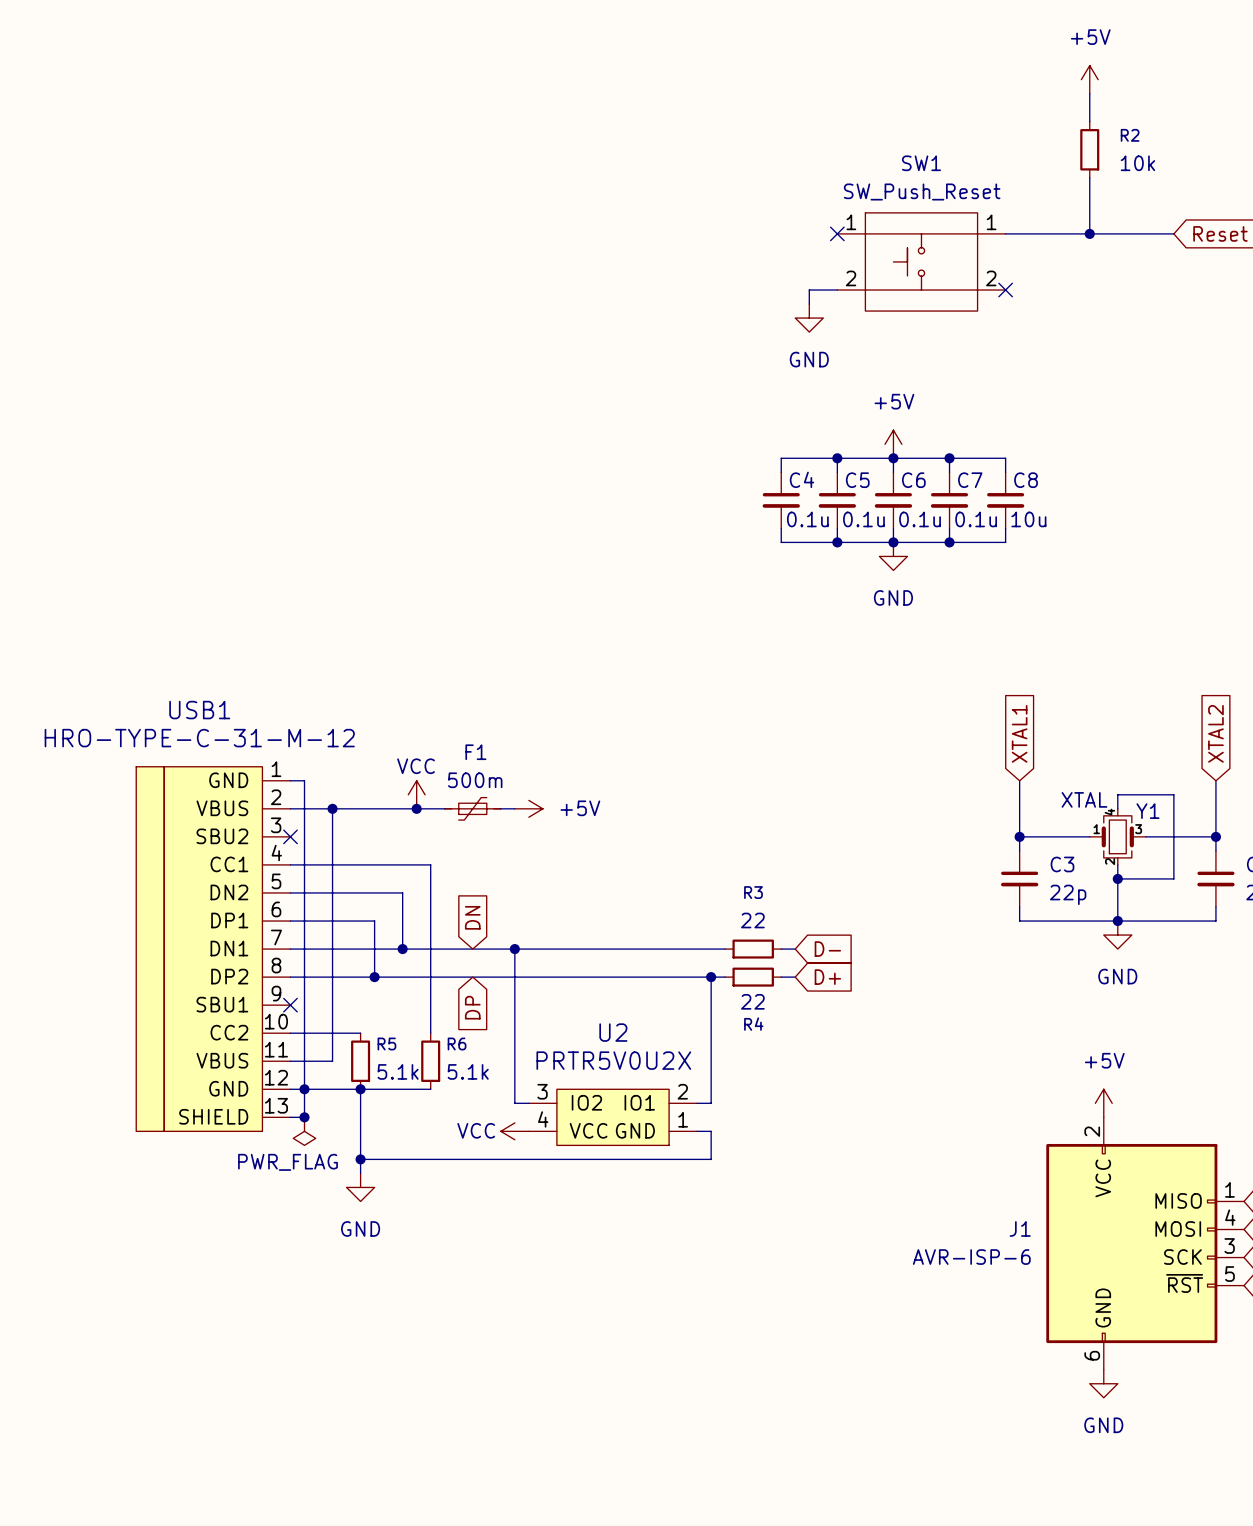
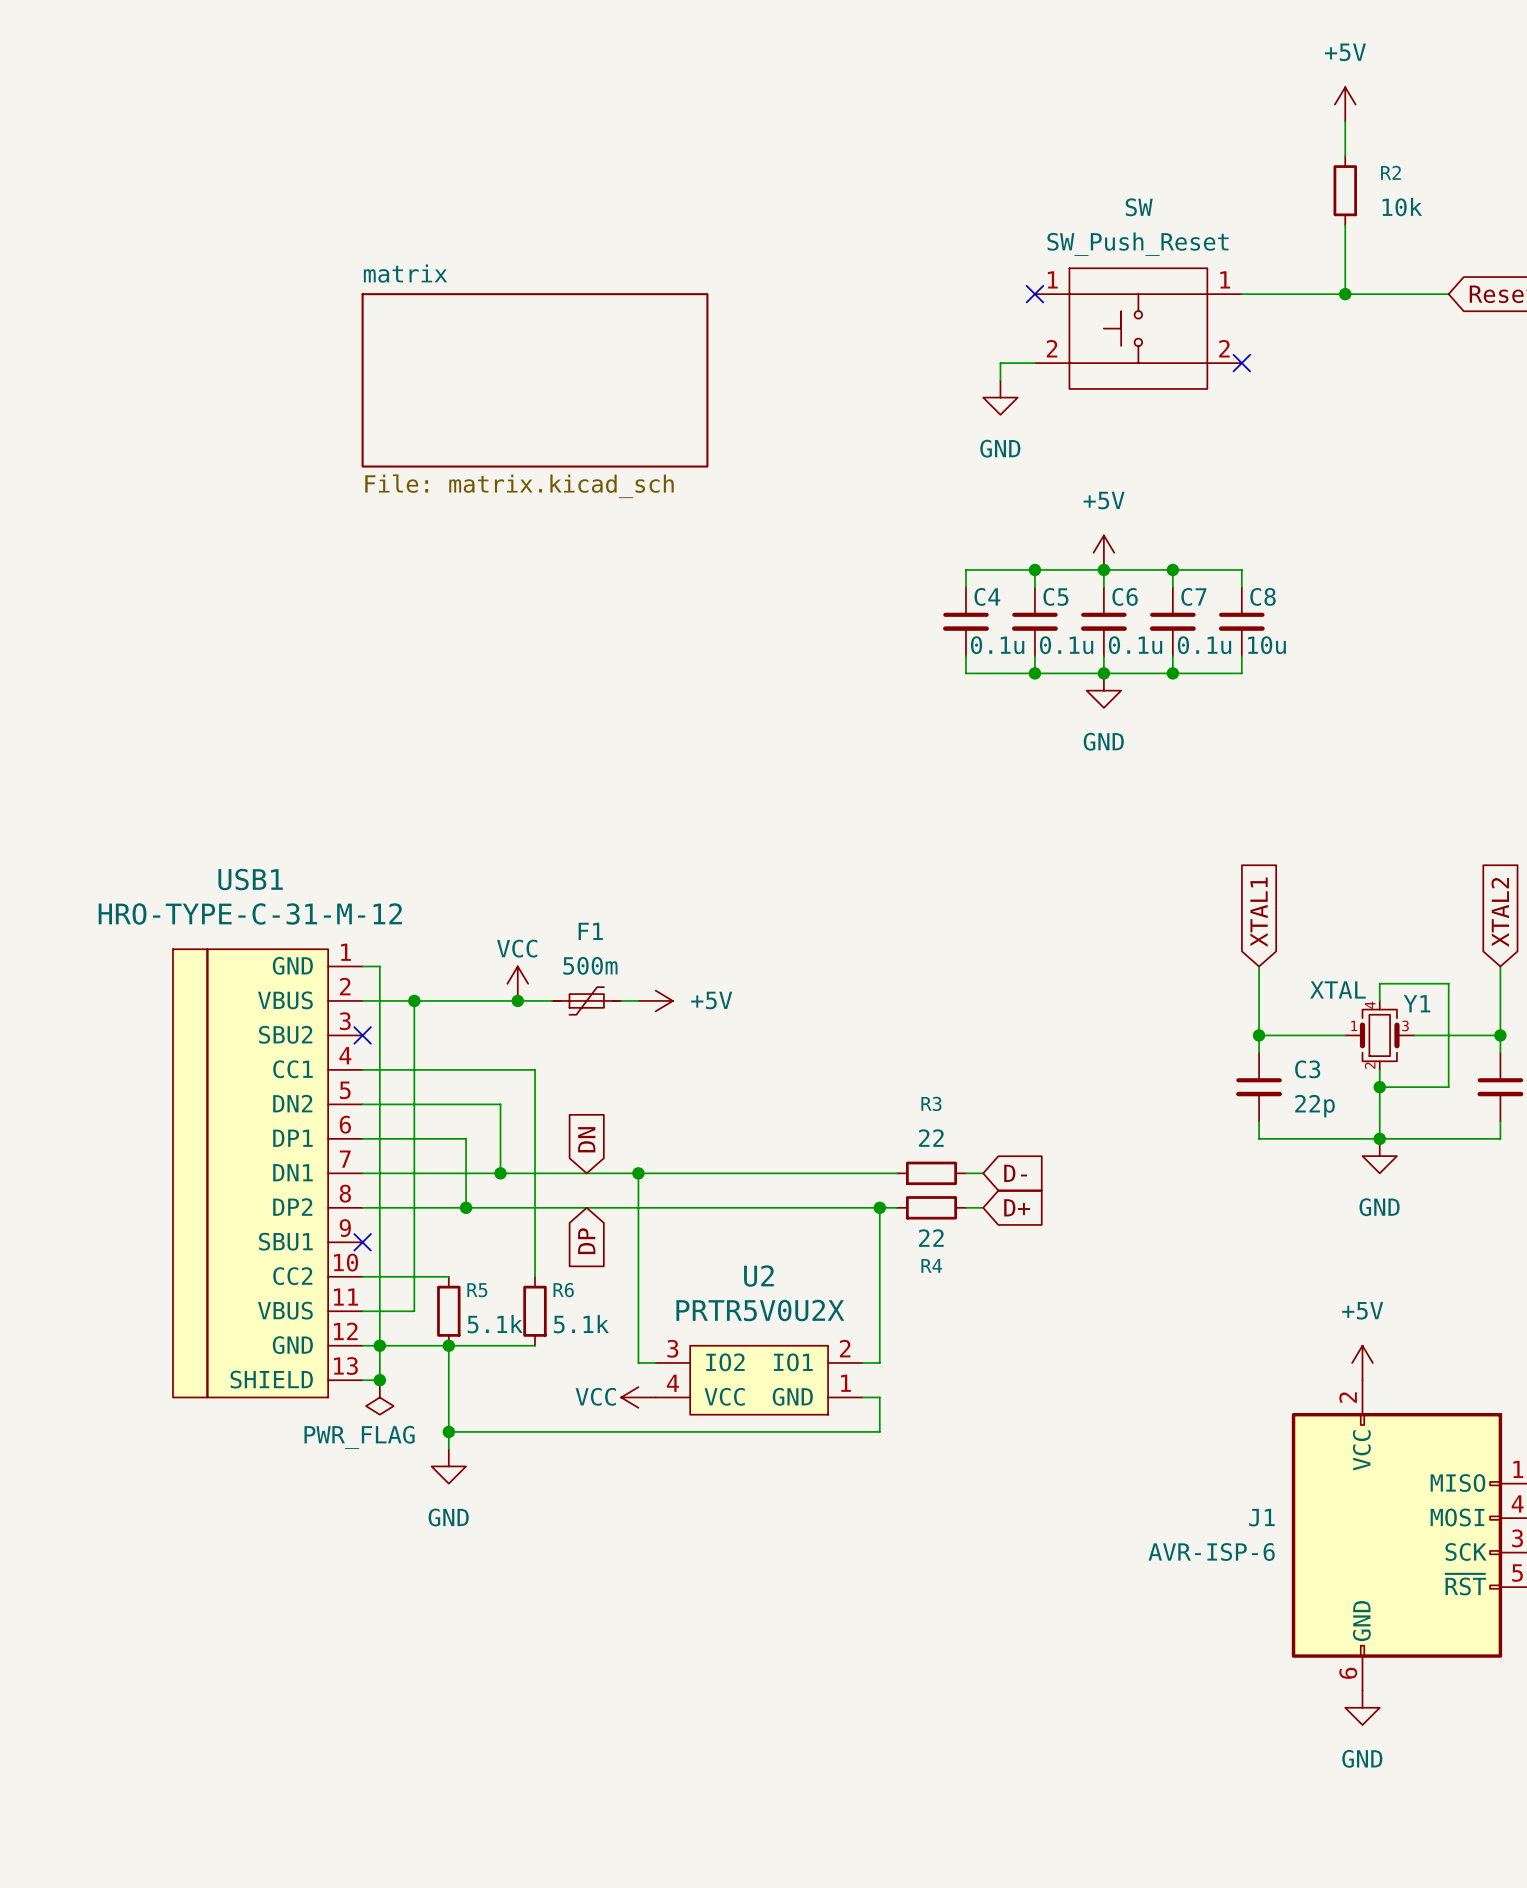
SW1 name: SW1 (921, 163) -> SW (1139, 207)
sheet matrix: none -> File: matrix.kicad_sch (535, 380)

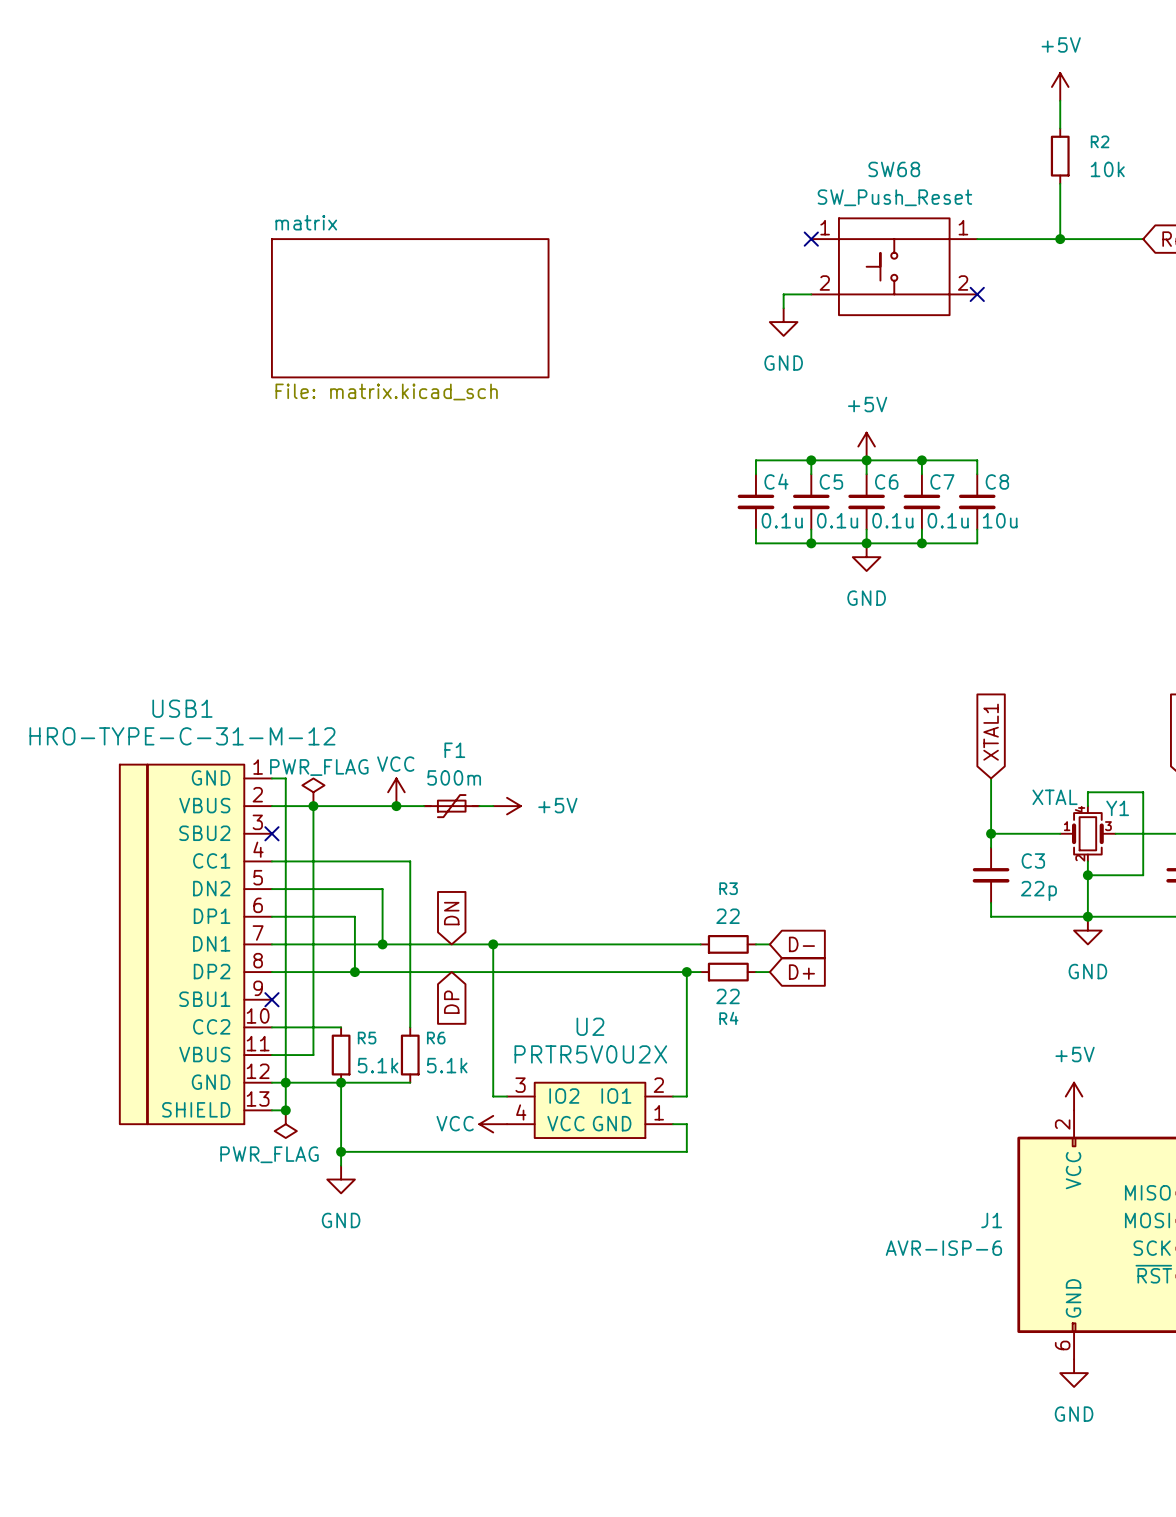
SW name: SW (1139, 207) -> SW68 (894, 169)
power symbol: none -> PWR_FLAG (313, 792)

